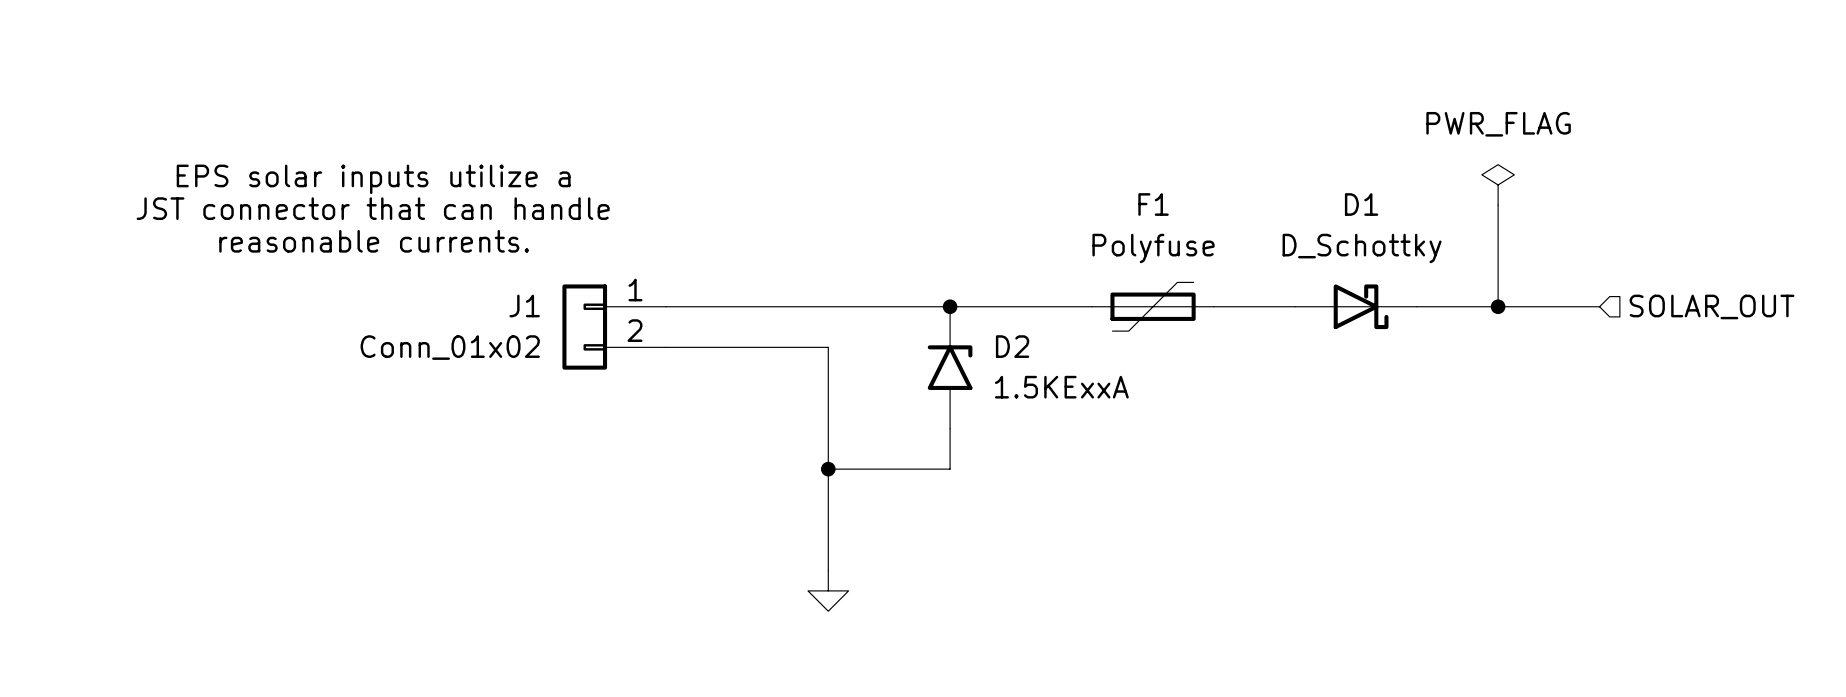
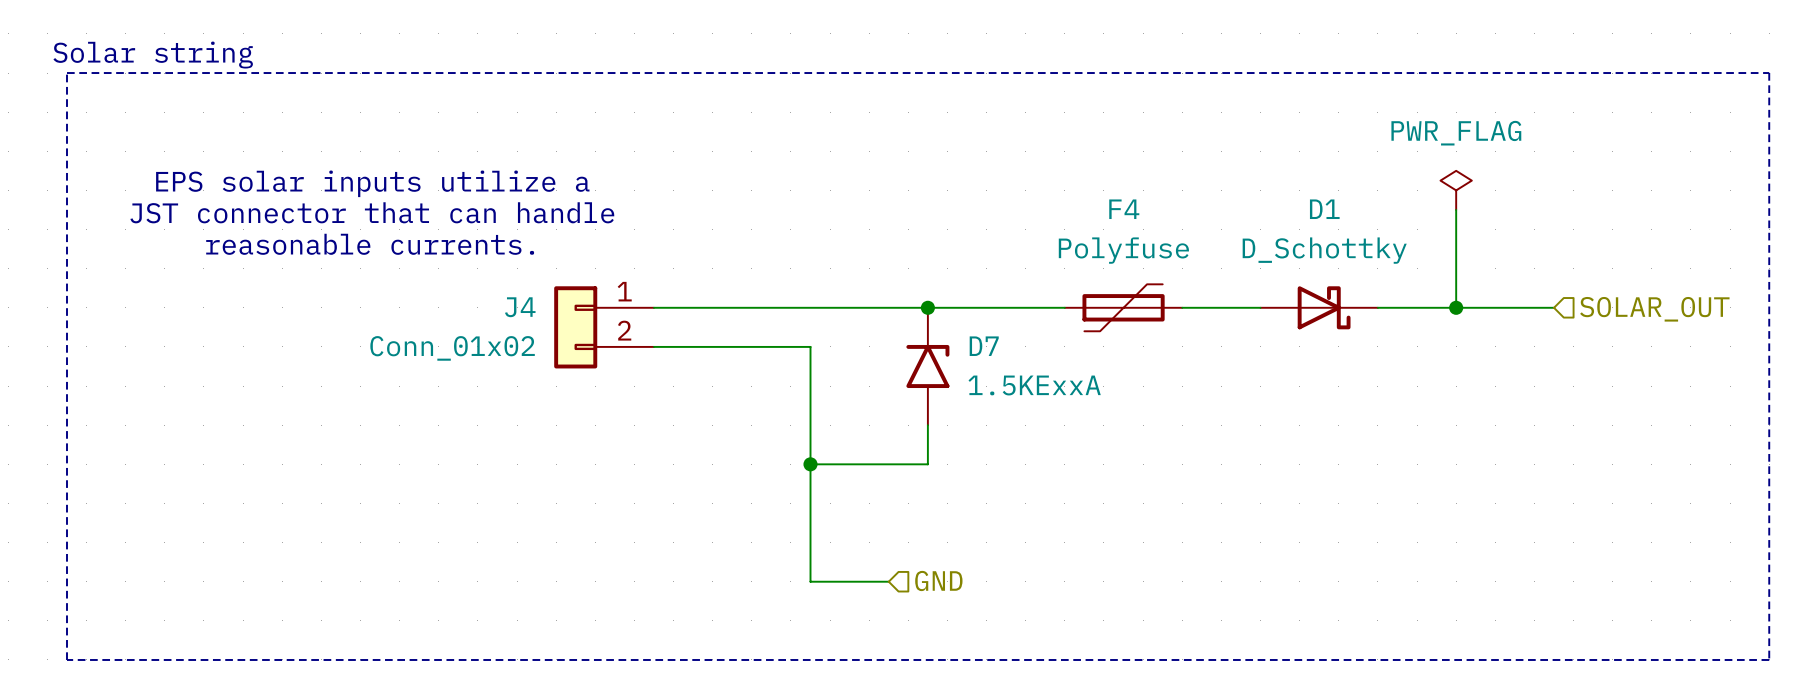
text: none -> Solar string (153, 55)
line: none -> (67, 73) (1769, 73) (1769, 659) (67, 659) (67, 73)
F1 name: F1 (1153, 204) -> F4 (1124, 209)
J1 name: J1 (524, 305) -> J4 (520, 307)
D2 name: D2 (1012, 346) -> D7 (984, 346)
wire: none -> (810, 562) (810, 581) (888, 581)
power symbol: (828, 590) -> none
hierarchical label: none -> GND (938, 580)

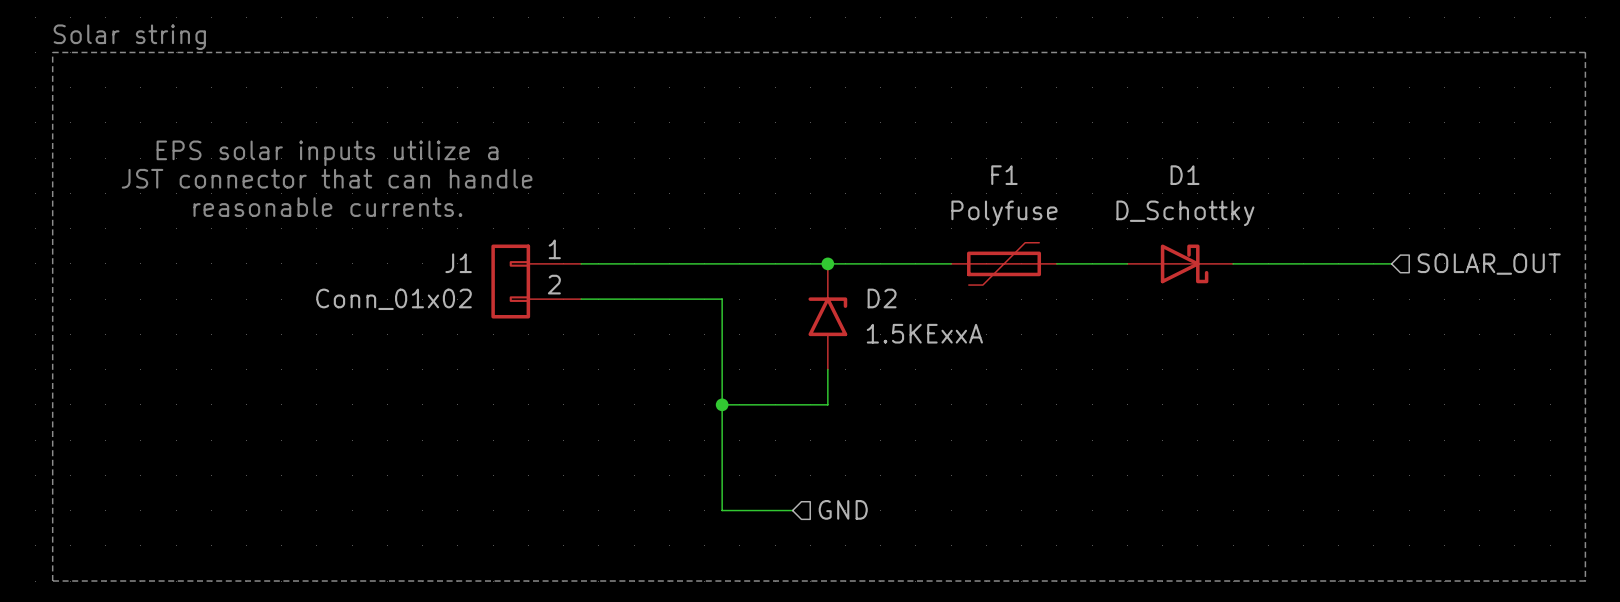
power symbol: PWR_FLAG (1456, 190) -> none
F4 name: F4 (1124, 209) -> F1 (1004, 175)
wire: (1456, 209) (1456, 307) -> none
J4 name: J4 (520, 307) -> J1 (458, 263)
junction: (1456, 307) -> none
D7 name: D7 (984, 346) -> D2 (882, 298)

